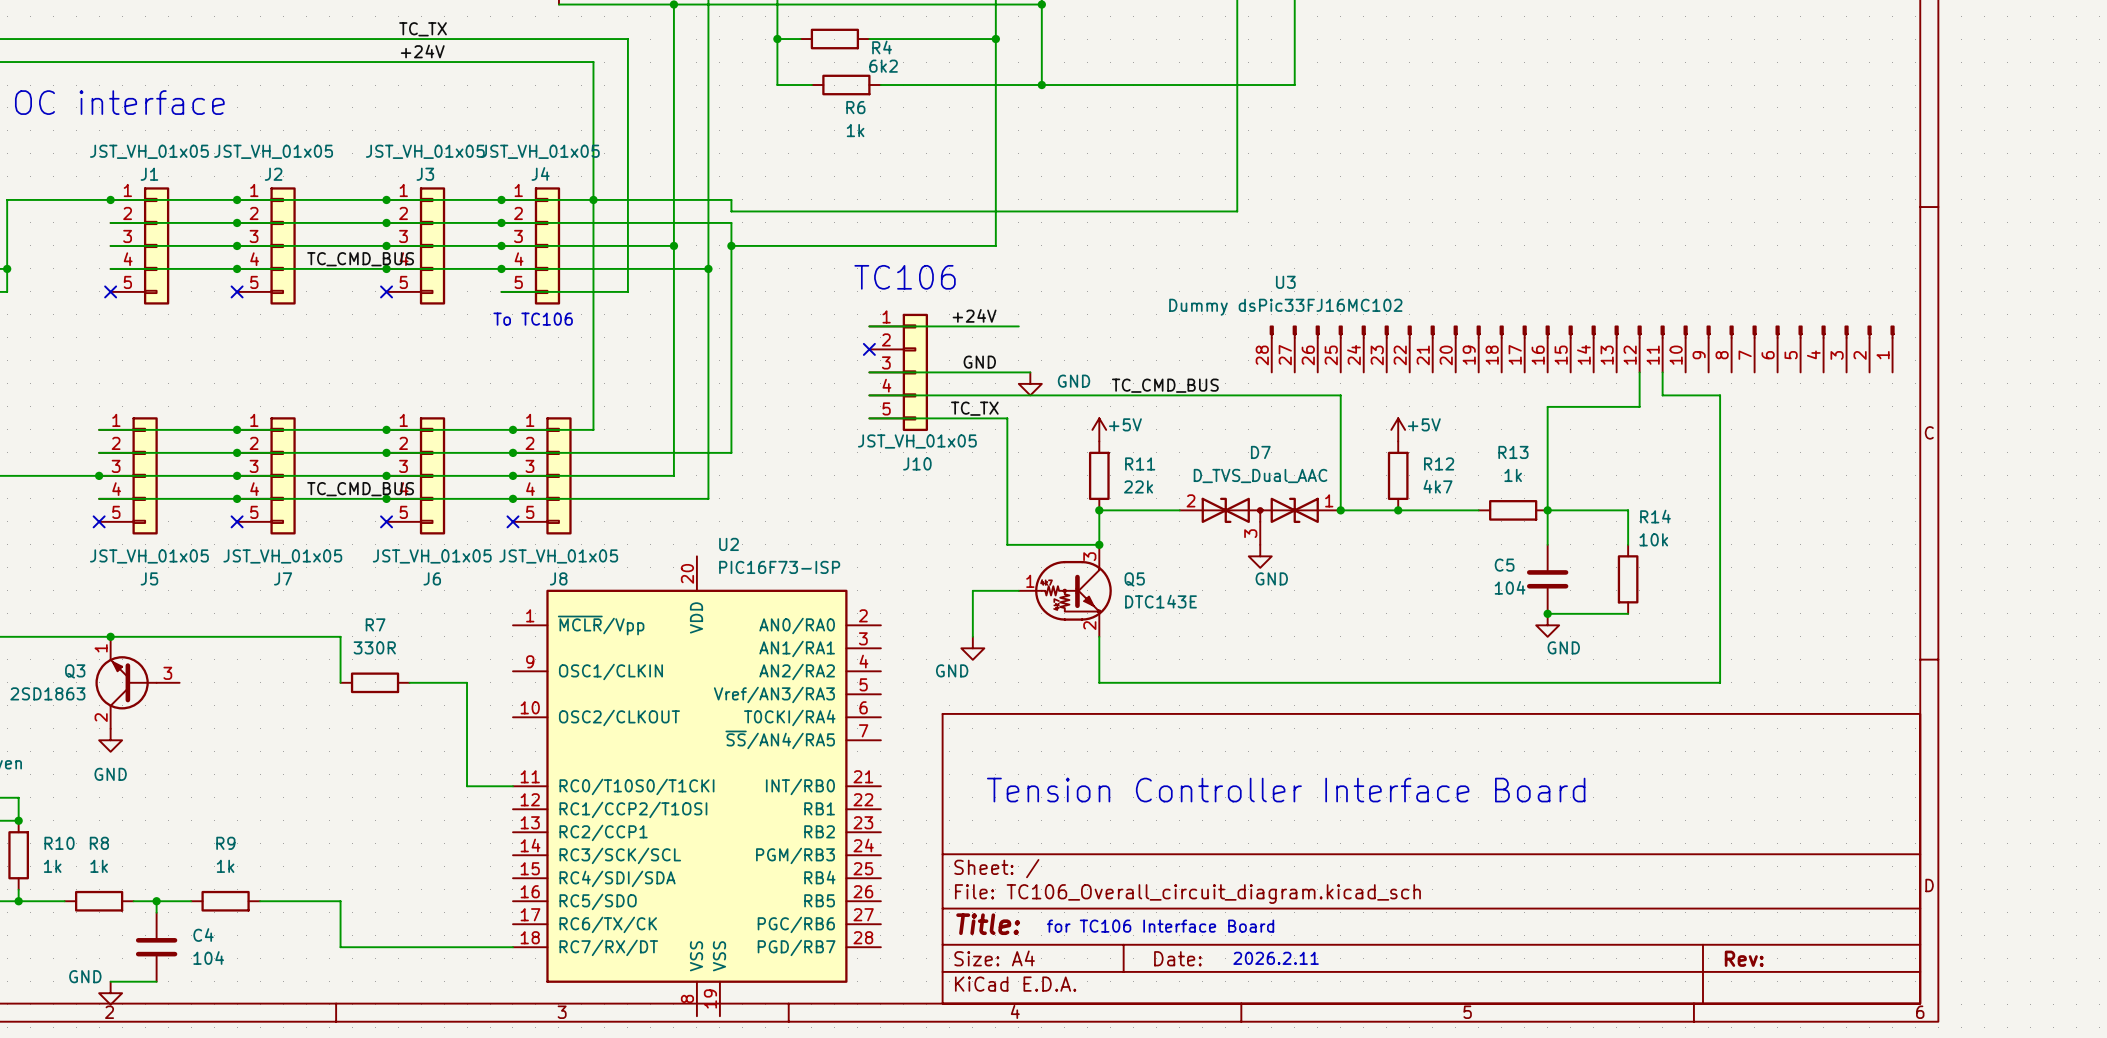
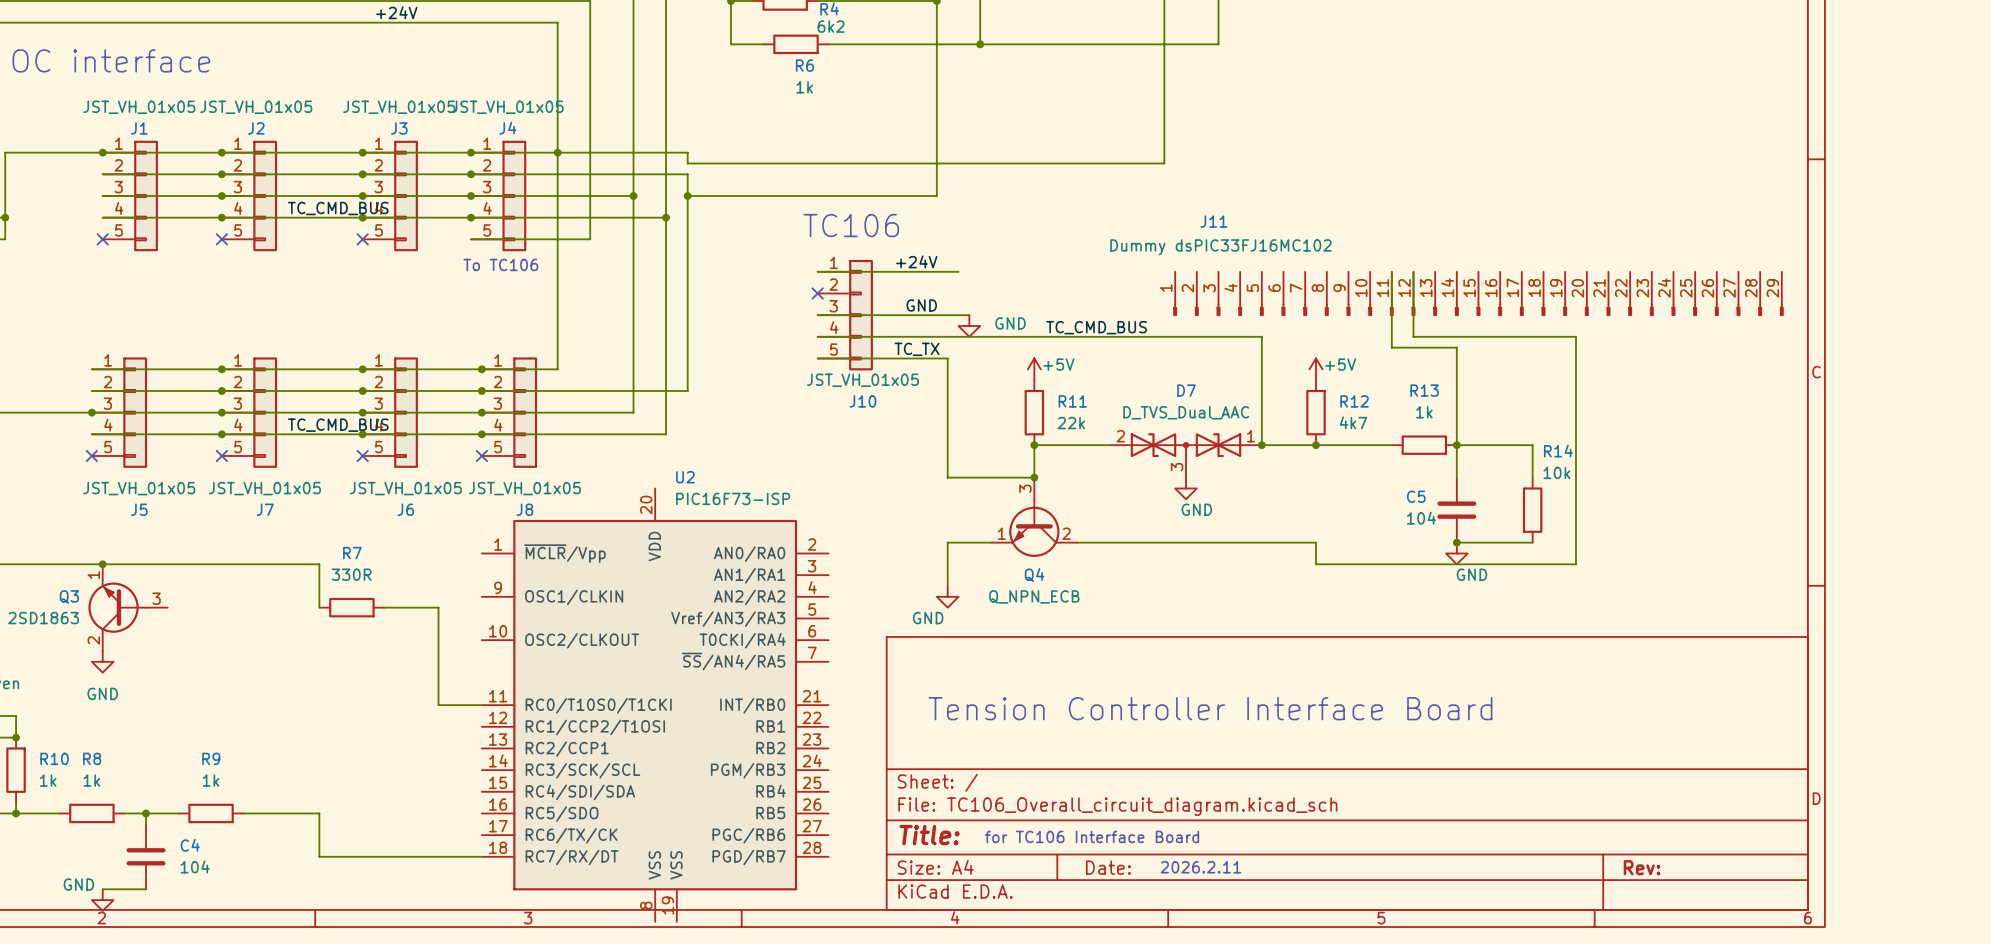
J11: none -> Dummy dsPIC33FJ16MC102 (1478, 293)
U3: Dummy dsPic33FJ16MC102 (1582, 349) -> none
wire: (1639, 372) (1639, 406) (1547, 406) -> (1391, 271) (1391, 347) (1456, 347)
wire: (1662, 372) (1662, 395) -> (1413, 271) (1413, 336) (1565, 336)
wire: (1674, 395) (1720, 395) (1720, 682) (1099, 682) (1099, 636) -> (1575, 336) (1575, 564) (1316, 564) (1316, 542) (1077, 542)
Q4: none -> Q_NPN_ECB (1034, 517)
wire: (1018, 590) (972, 590) (972, 636) -> (991, 542) (947, 542) (947, 585)
Q5: DTC143E (1065, 590) -> none
power symbol position: GND (972, 648) -> GND (947, 596)

